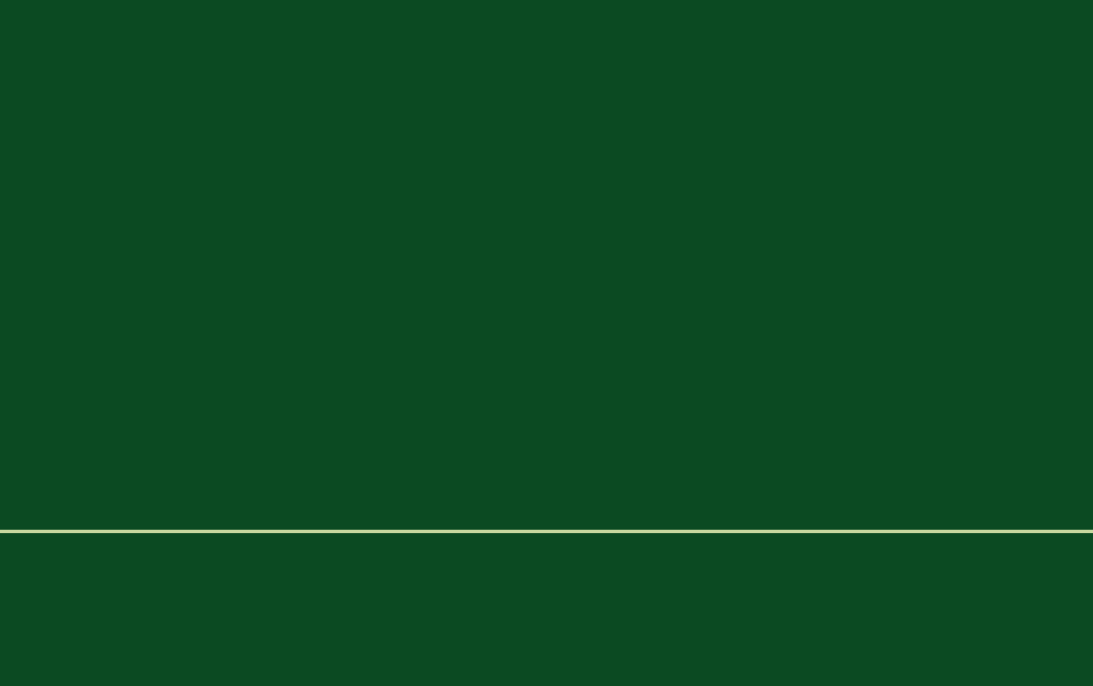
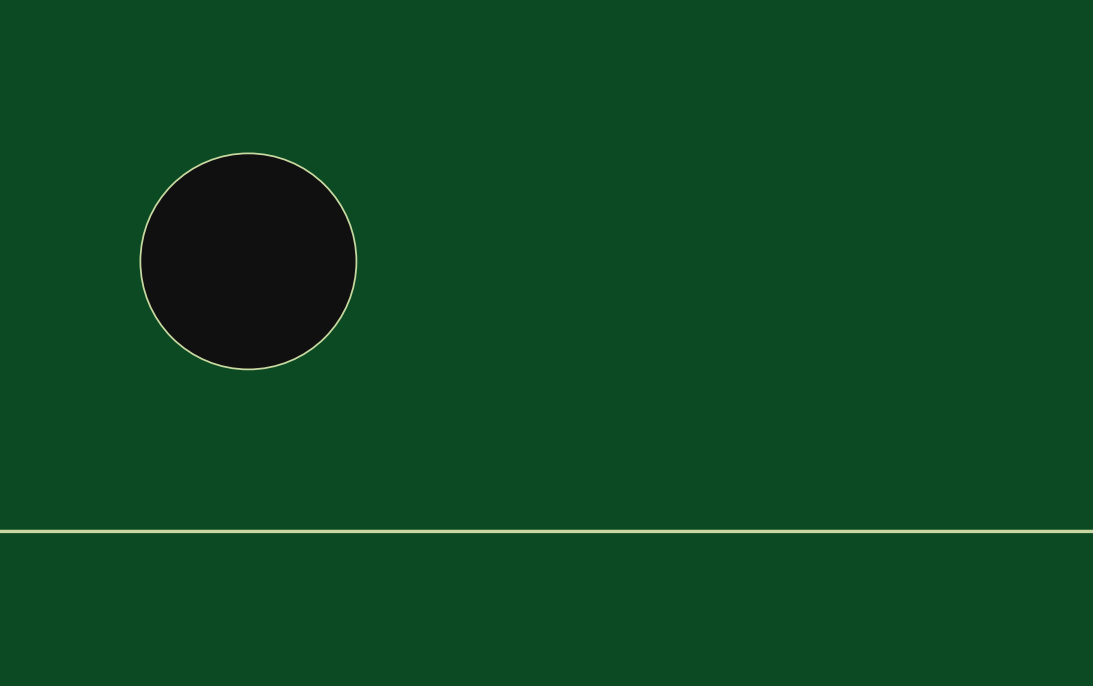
part: none -> (248, 261)

